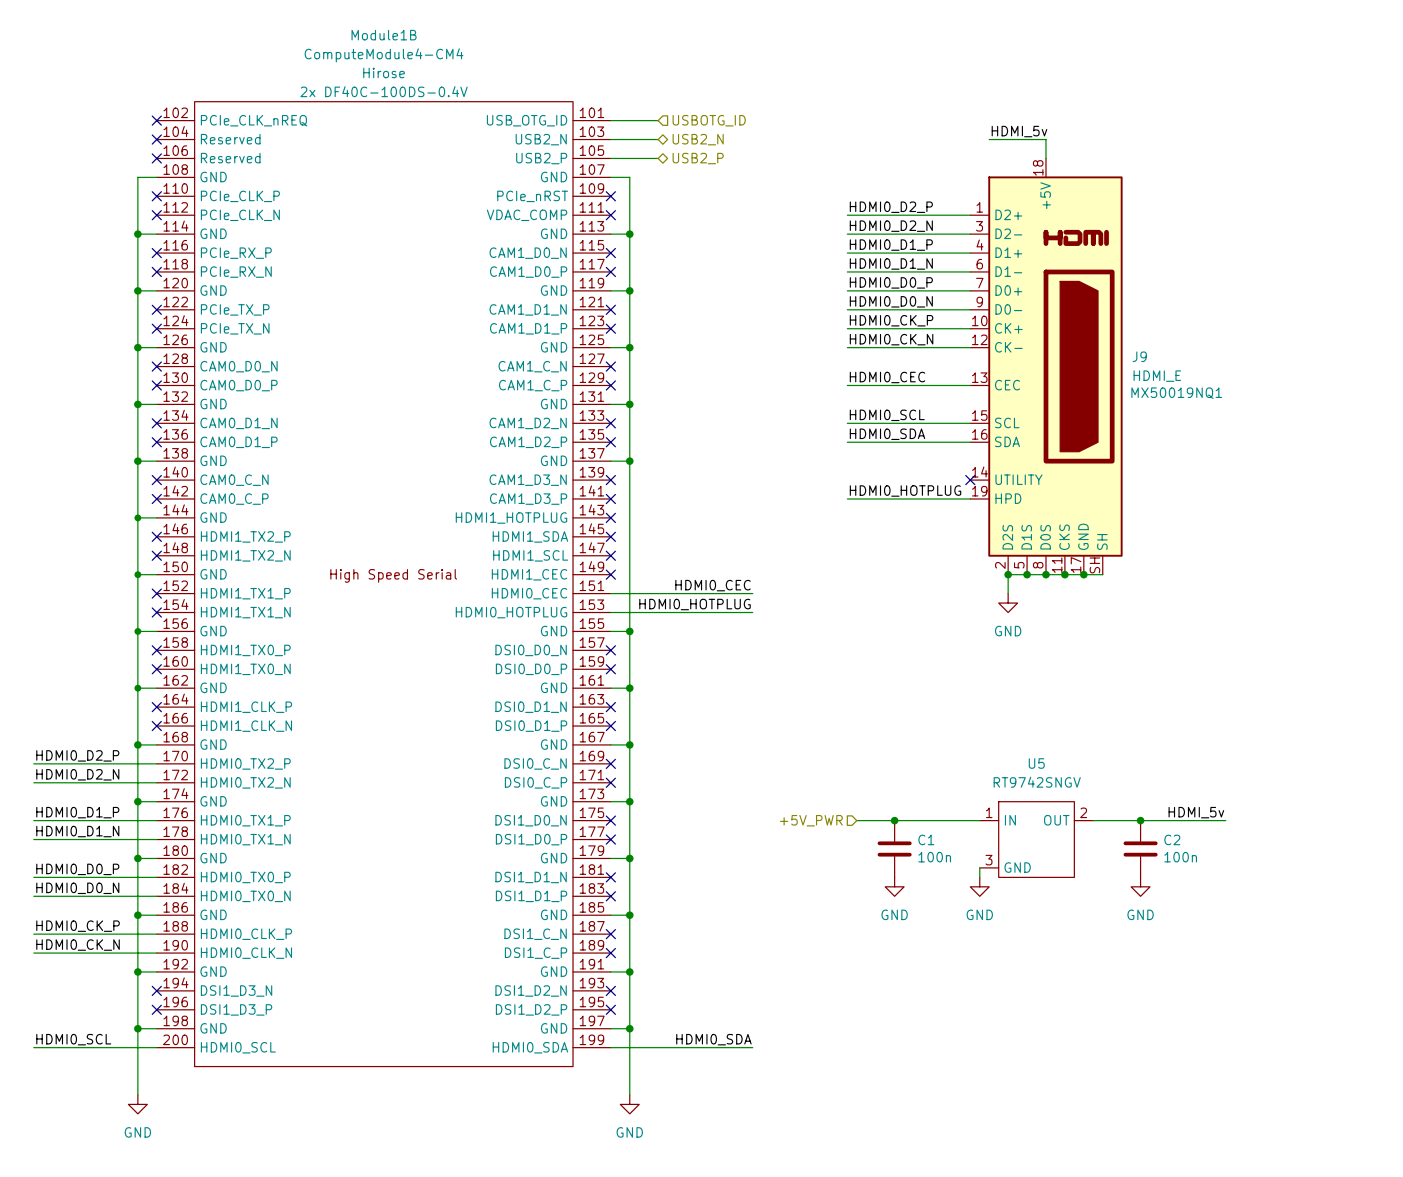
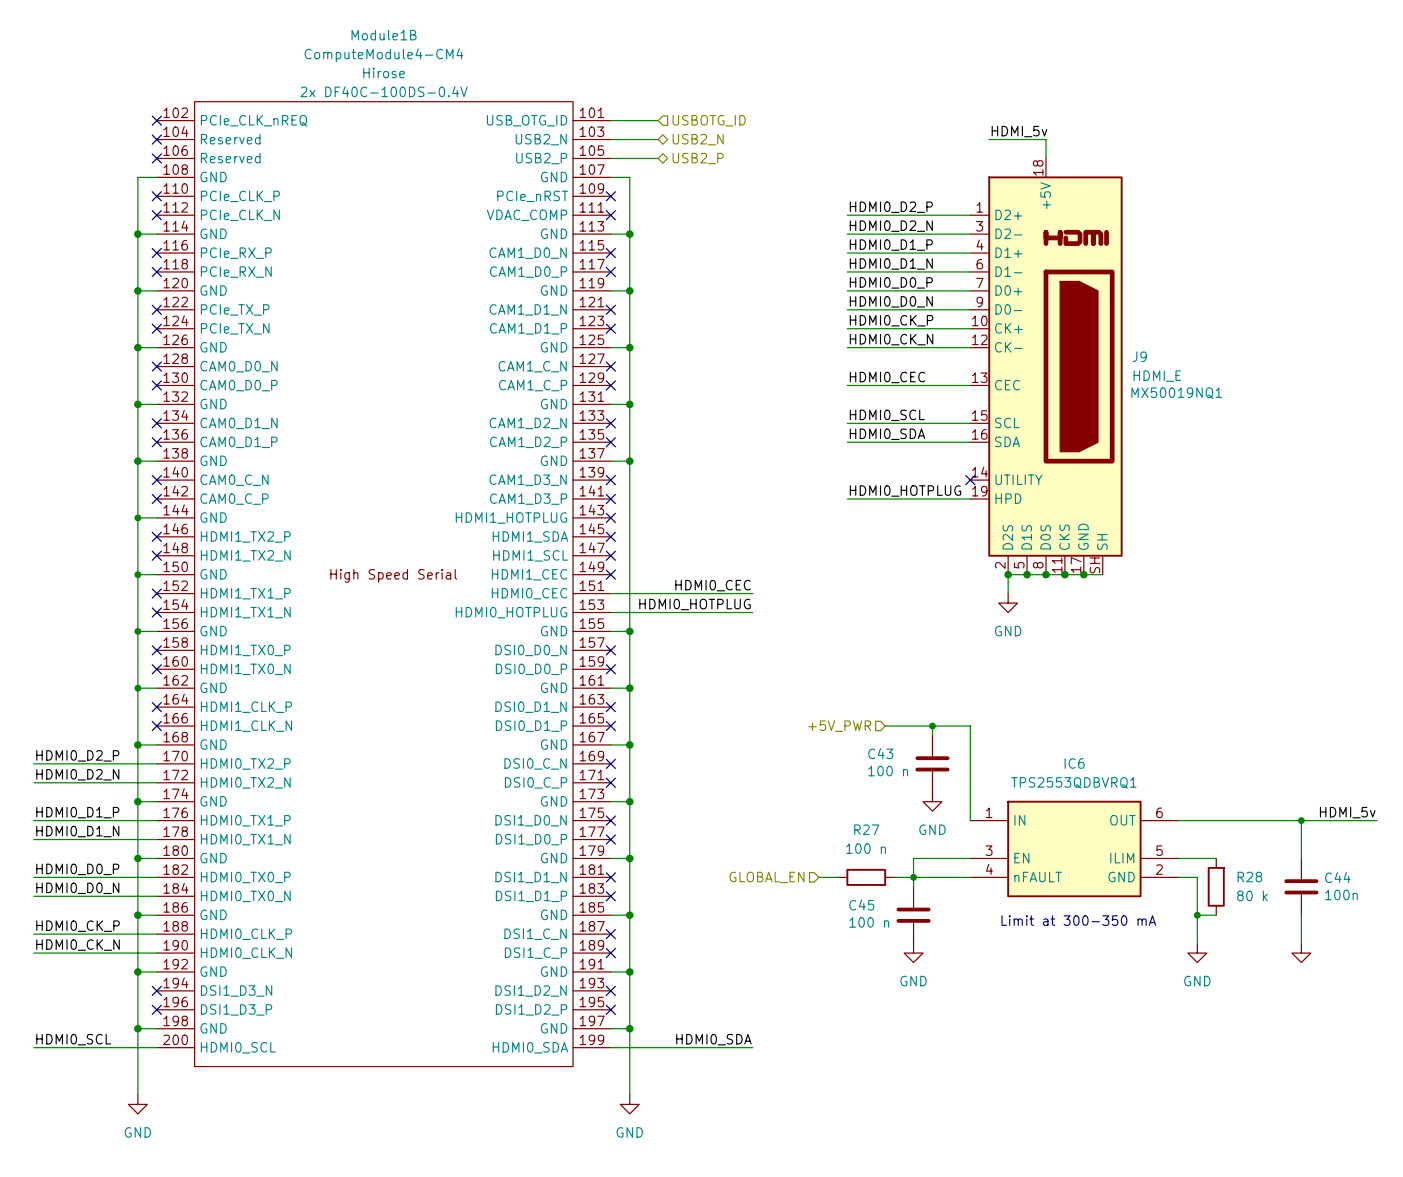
wire: none -> (885, 726) (970, 726) (970, 820)
junction: none -> (932, 726)
C43: none -> 100 n (932, 763)
power symbol: none -> GND (932, 801)
label position: HDMI_5v (1196, 812) -> HDMI_5v (1347, 812)
hierarchical label position: +5V_PWR (811, 820) -> +5V_PWR (839, 726)
wire: (856, 820) (979, 820) -> none
junction: (894, 820) -> none
junction: (1140, 820) -> none
wire: none -> (1225, 820) (1377, 820)
wire: none -> (1301, 820) (1301, 858)
junction: none -> (1301, 820)
U5: RT9742SNGV (1036, 839) -> none
C1: 100n (894, 849) -> none
IC6: none -> TPS2553QDBVRQ1 (1074, 849)
C2: 100n (1140, 849) -> none
wire: none -> (970, 858) (913, 858) (913, 886)
wire: none -> (1178, 858) (1216, 858)
wire: (979, 867) (979, 877) -> (932, 726) (932, 735)
hierarchical label: none -> GLOBAL_EN (767, 877)
wire: none -> (818, 877) (837, 877)
R27: none -> 100 n (866, 877)
wire: none -> (894, 877) (970, 877)
junction: none -> (913, 877)
wire: none -> (1178, 877) (1197, 877) (1197, 943)
power symbol: GND (894, 886) -> none
power symbol: GND (979, 886) -> none
power symbol position: GND (1140, 886) -> GND (1197, 953)
R28: none -> 80 k (1216, 886)
C44: none -> 100n (1301, 886)
C45: none -> 100 n (913, 915)
wire: none -> (1197, 915) (1216, 915)
junction: none -> (1197, 915)
wire: none -> (1301, 915) (1301, 943)
text: none -> Limit at 300-350 mA (1078, 920)
power symbol: none -> GND (913, 953)
power symbol: none -> (1301, 953)

